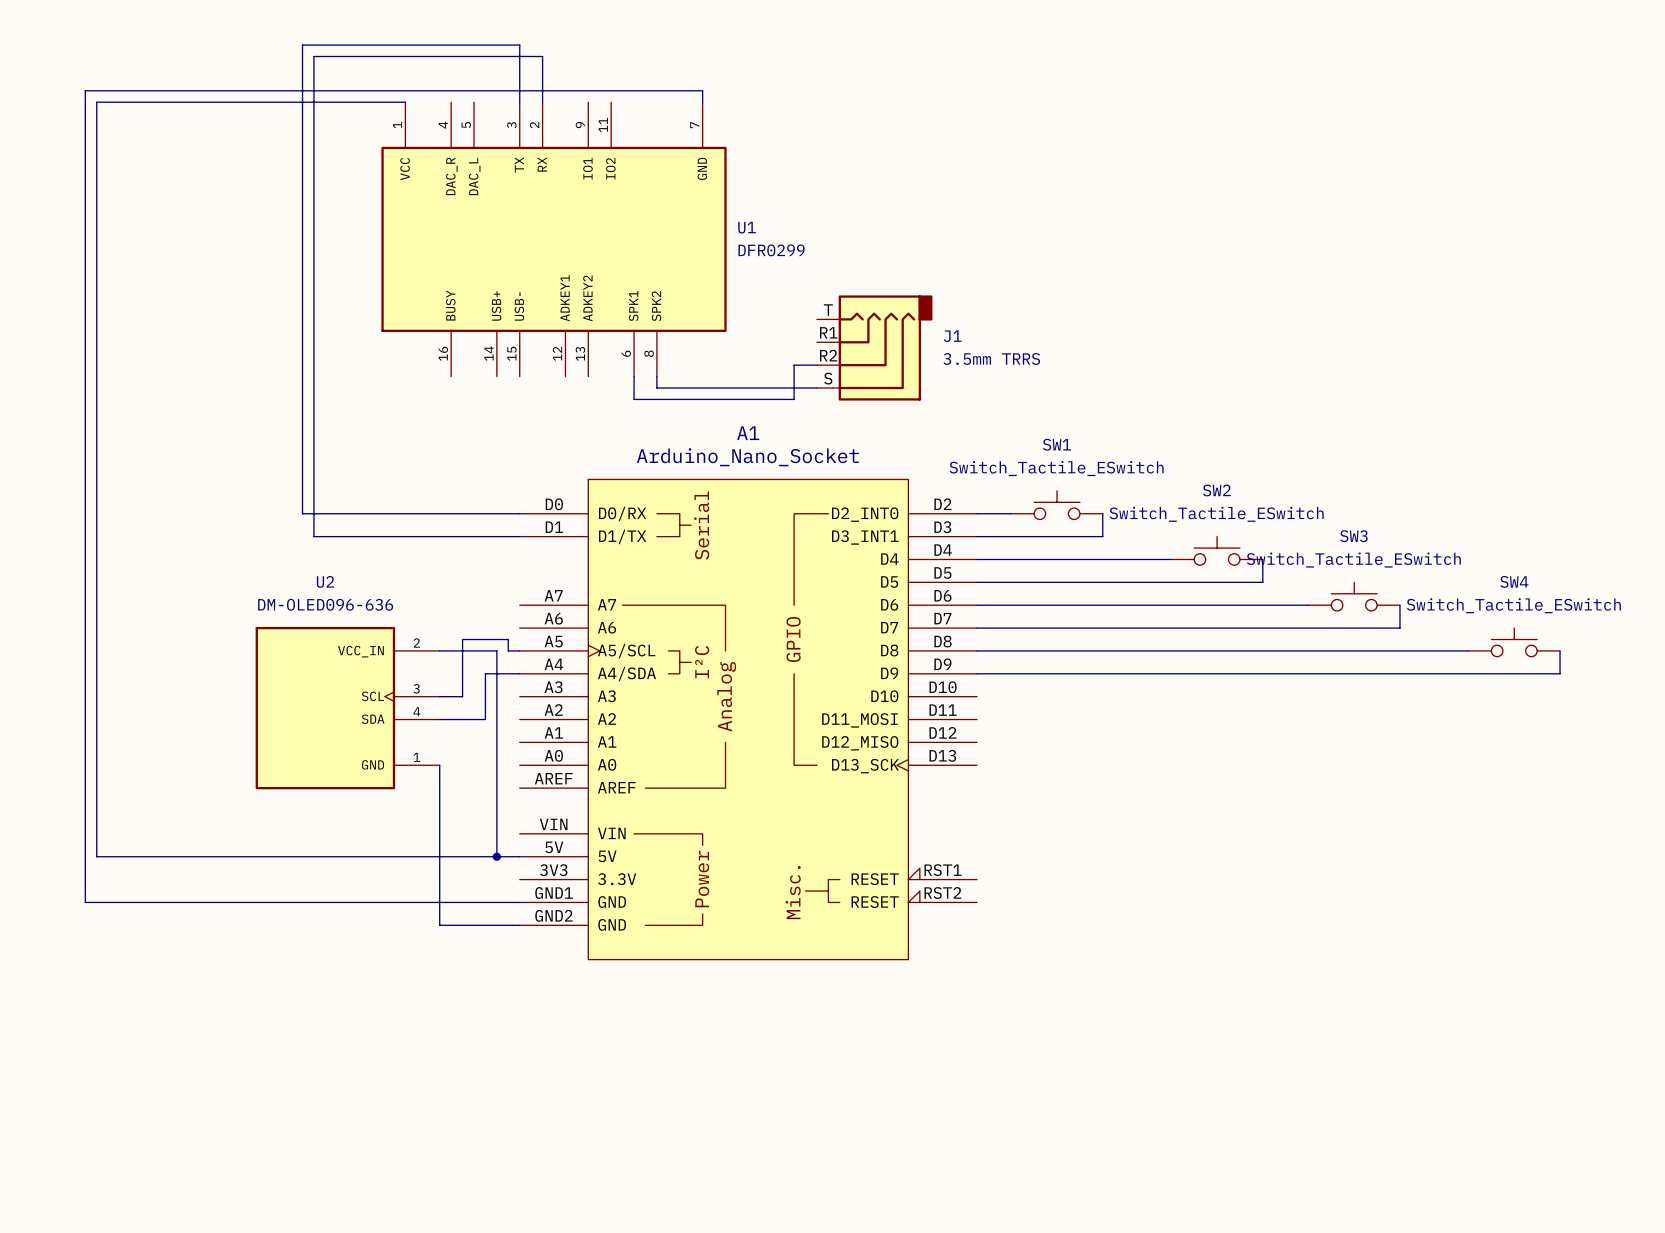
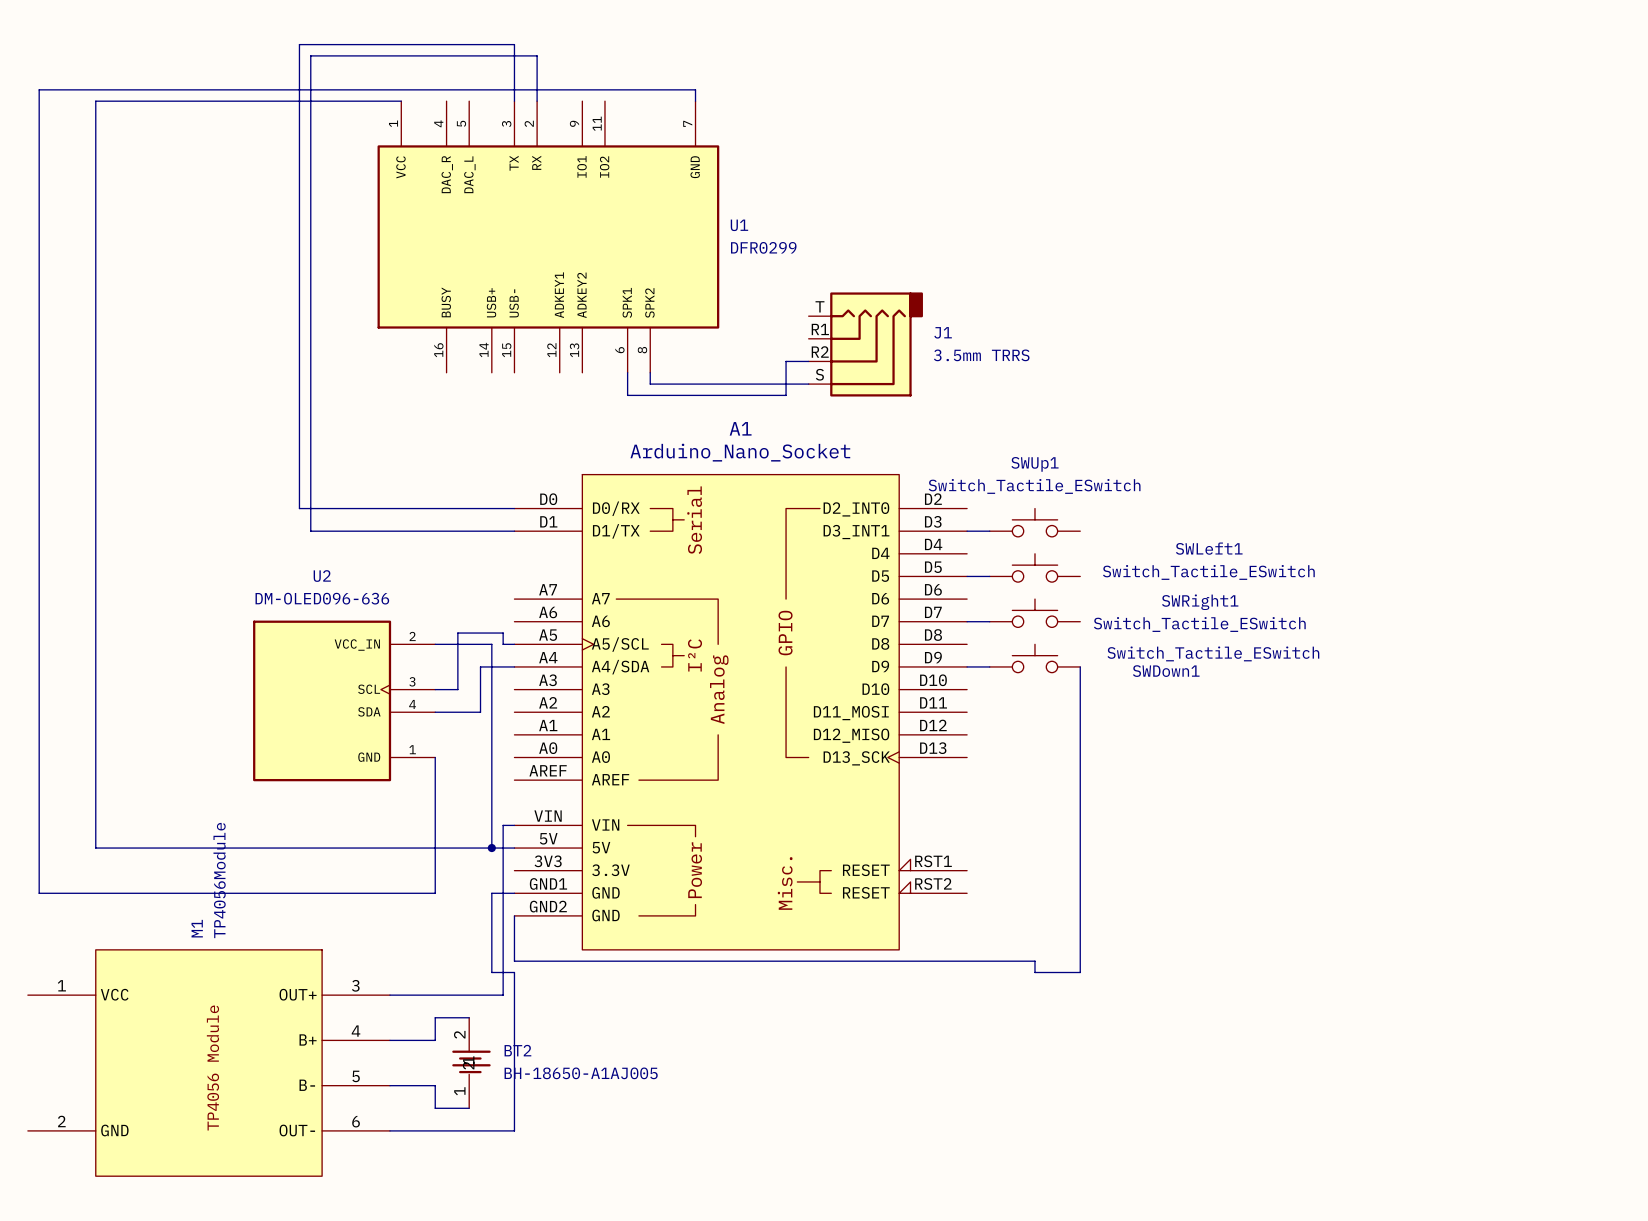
wire: (85, 90) (85, 902) -> (84, 89) (39, 89) (39, 893) (84, 893)
SW1: Switch_Tactile_ESwitch (1057, 505) -> none
wire: (977, 513) (1011, 513) -> none
wire: (1102, 513) (1102, 536) (999, 536) -> none
SWUp1: none -> Switch_Tactile_ESwitch (1034, 522)
SW2: Switch_Tactile_ESwitch (1217, 550) -> none
wire: (977, 559) (1171, 559) -> none
wire: (1262, 559) (1262, 582) (999, 582) -> none
SWLeft1: none -> Switch_Tactile_ESwitch (1034, 567)
SW3: Switch_Tactile_ESwitch (1354, 596) -> none
wire: (977, 605) (1308, 605) -> none
wire: (1399, 605) (1399, 628) (999, 628) -> none
SWRight1: none -> Switch_Tactile_ESwitch (1034, 613)
SW4: Switch_Tactile_ESwitch (1514, 642) -> none
wire: (977, 650) (1468, 650) -> none
wire: (1560, 650) (1560, 673) (999, 673) -> none
SWDown1: none -> Switch_Tactile_ESwitch (1034, 658)
wire: none -> (1080, 666) (1080, 972) (1034, 972) (1034, 961) (514, 961) (514, 915)
wire: none -> (514, 825) (503, 825) (503, 995) (389, 995)
wire: (496, 902) (439, 902) (439, 925) (519, 925) -> (491, 893) (491, 972) (514, 972) (514, 1130) (389, 1130)
wire: none -> (469, 1017) (435, 1017) (435, 1040) (389, 1040)
M1: none -> TP4056Module (208, 1063)
BT2: none -> BH-18650-A1AJ005 (471, 1063)
wire: none -> (389, 1085) (435, 1085) (435, 1108) (469, 1108)

